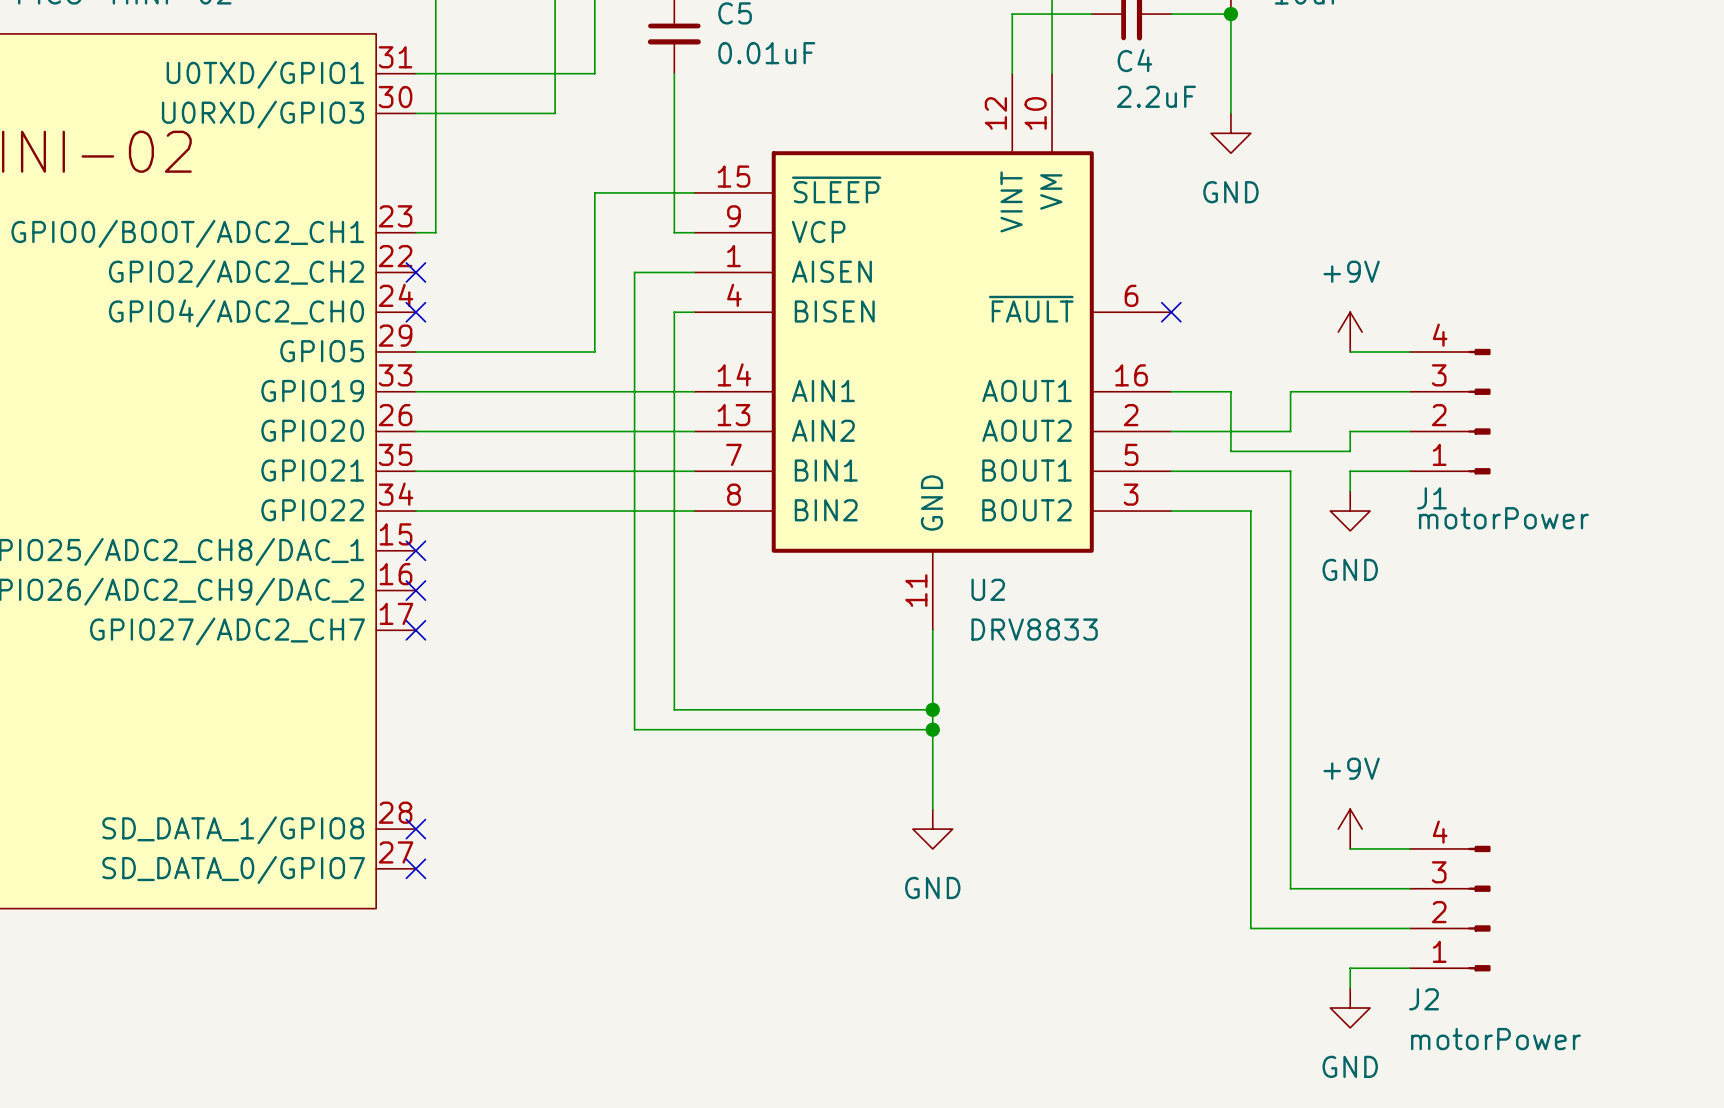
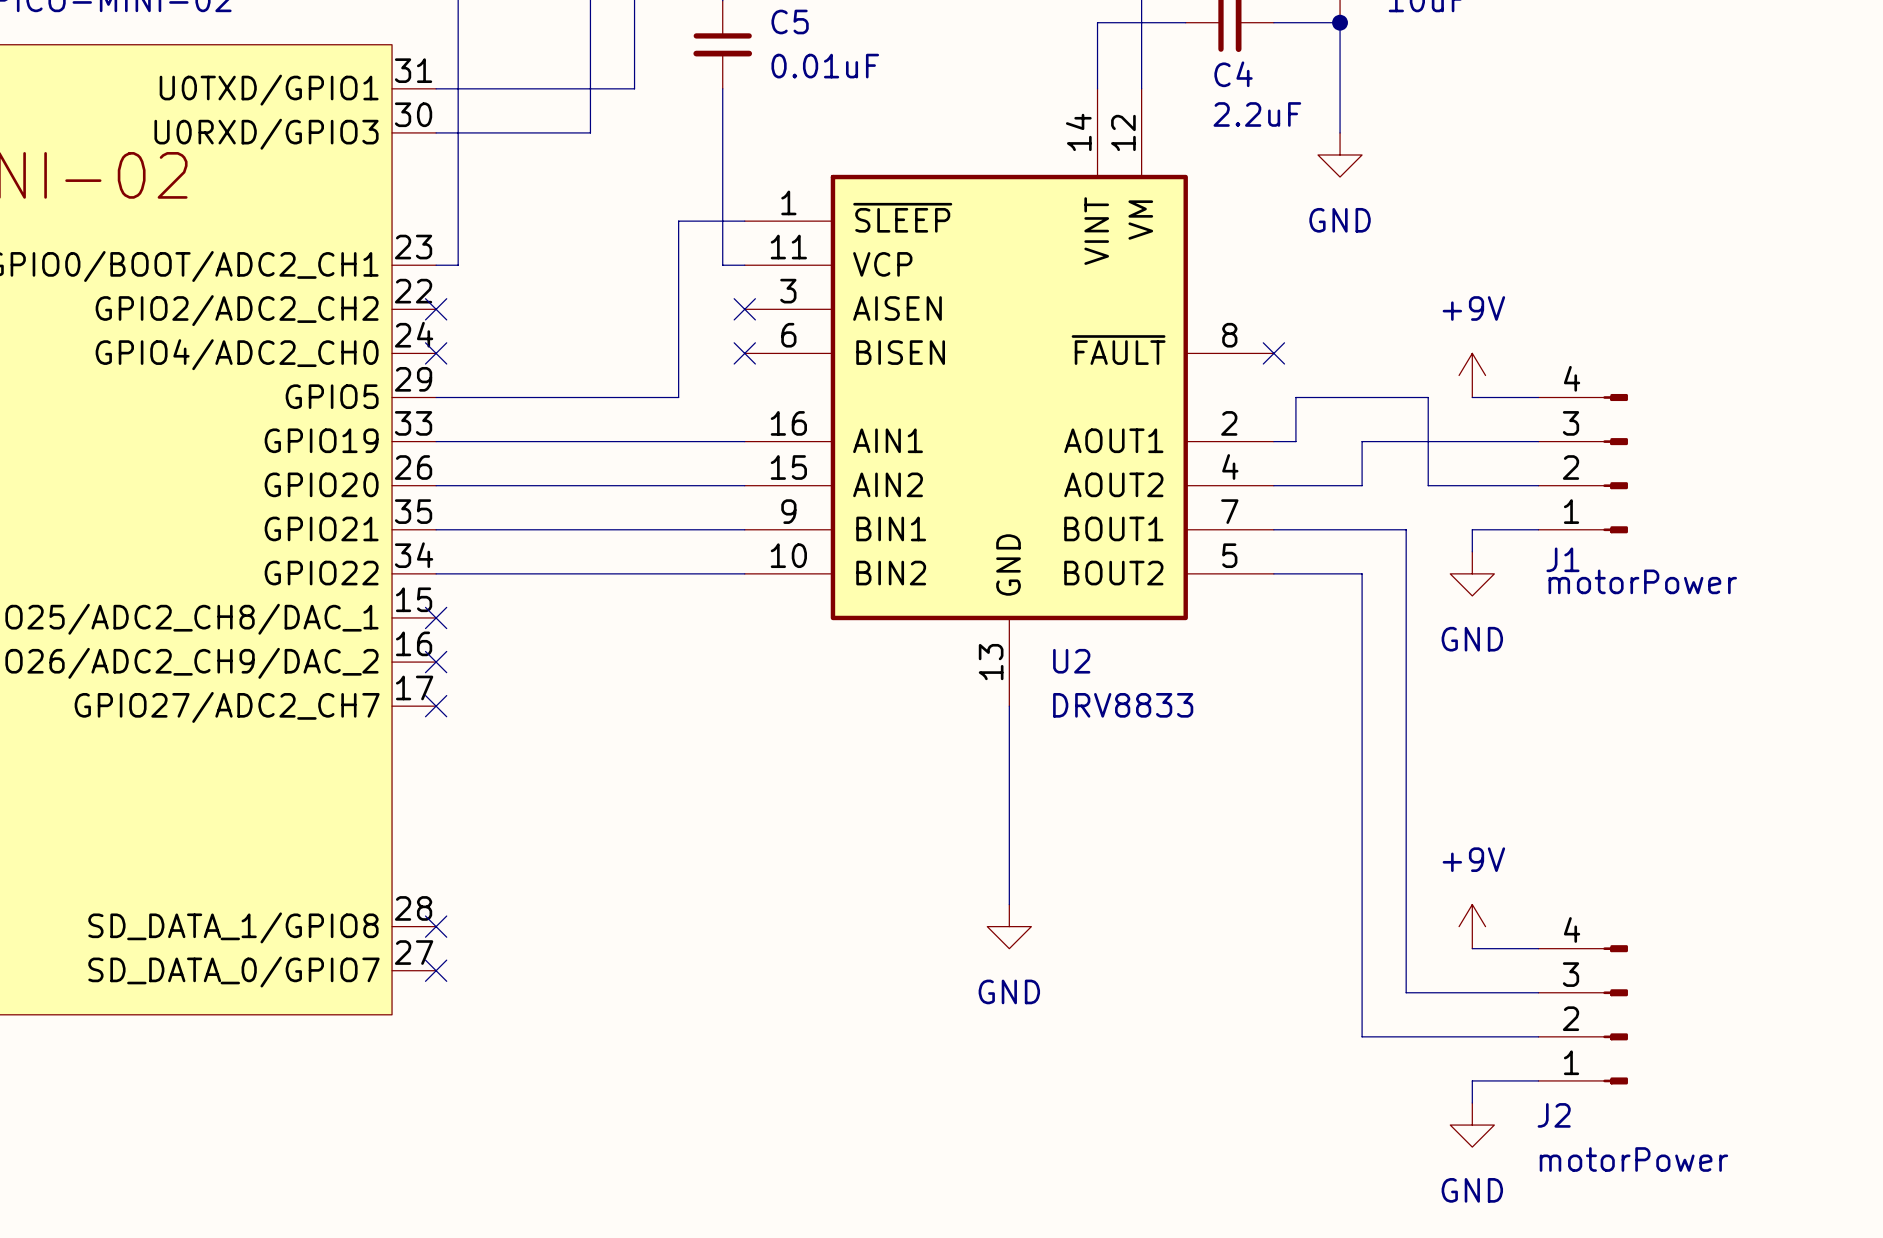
U2 symbol: [694, 73, 1172, 631] -> [744, 88, 1274, 707]
wire: (634, 192) (594, 192) (594, 351) -> (678, 221) (678, 309)
wire: (634, 272) (694, 272) -> none
no-connect mark: none -> (744, 309)
wire: (694, 312) (674, 312) (674, 709) (932, 709) -> none
no-connect mark: none -> (744, 353)
wire: (634, 351) (634, 729) (932, 729) -> (678, 397) (634, 397)
wire: (1191, 391) (1230, 391) (1230, 451) (1350, 451) (1350, 431) -> (1295, 441) (1295, 397) (1428, 397) (1428, 485) (1472, 485)
wire: (1290, 391) (1290, 431) (1250, 431) -> (1406, 441) (1362, 441) (1362, 485)
junction: (932, 709) -> none
junction: (932, 729) -> none

